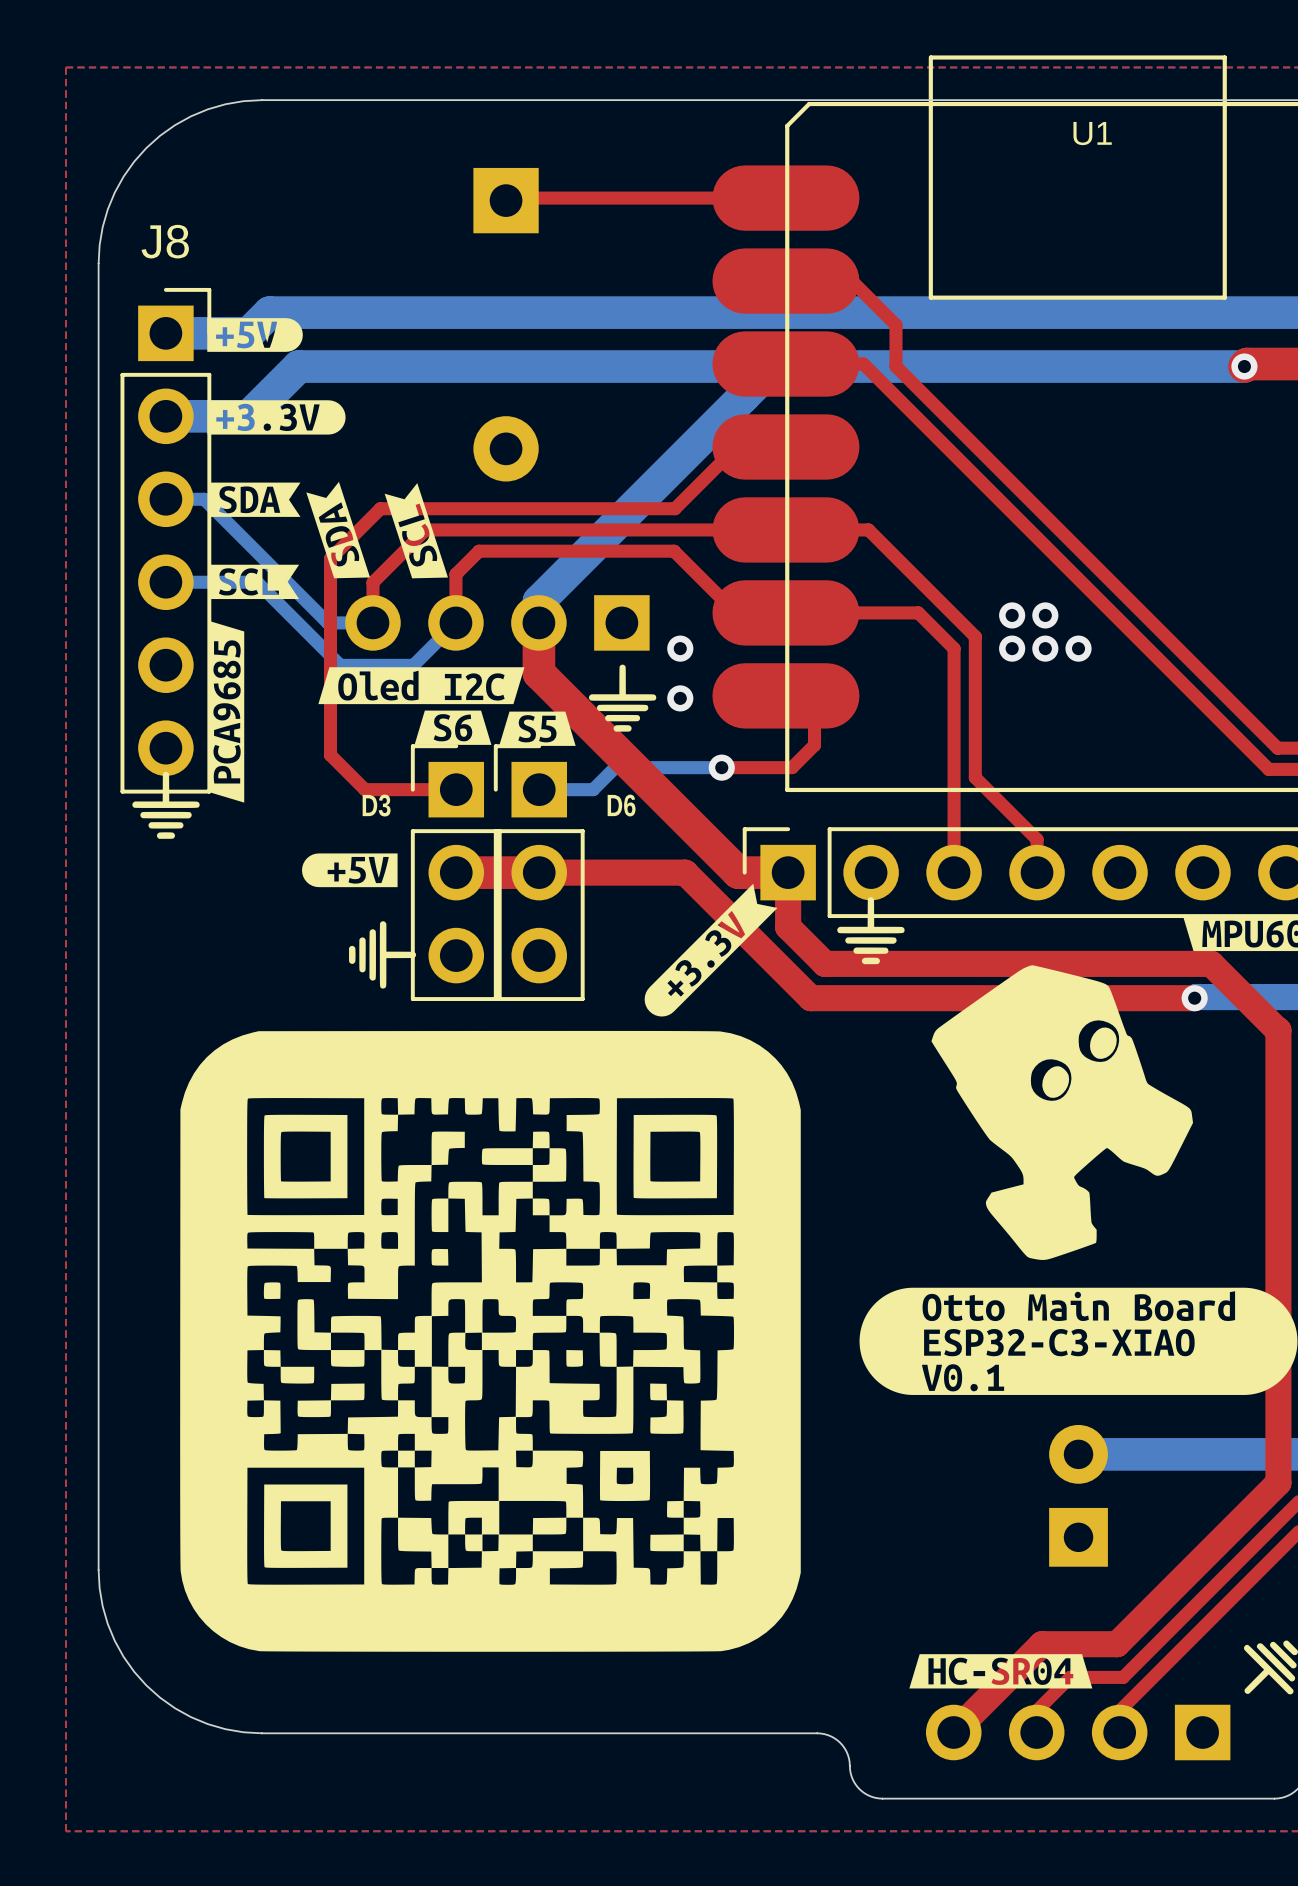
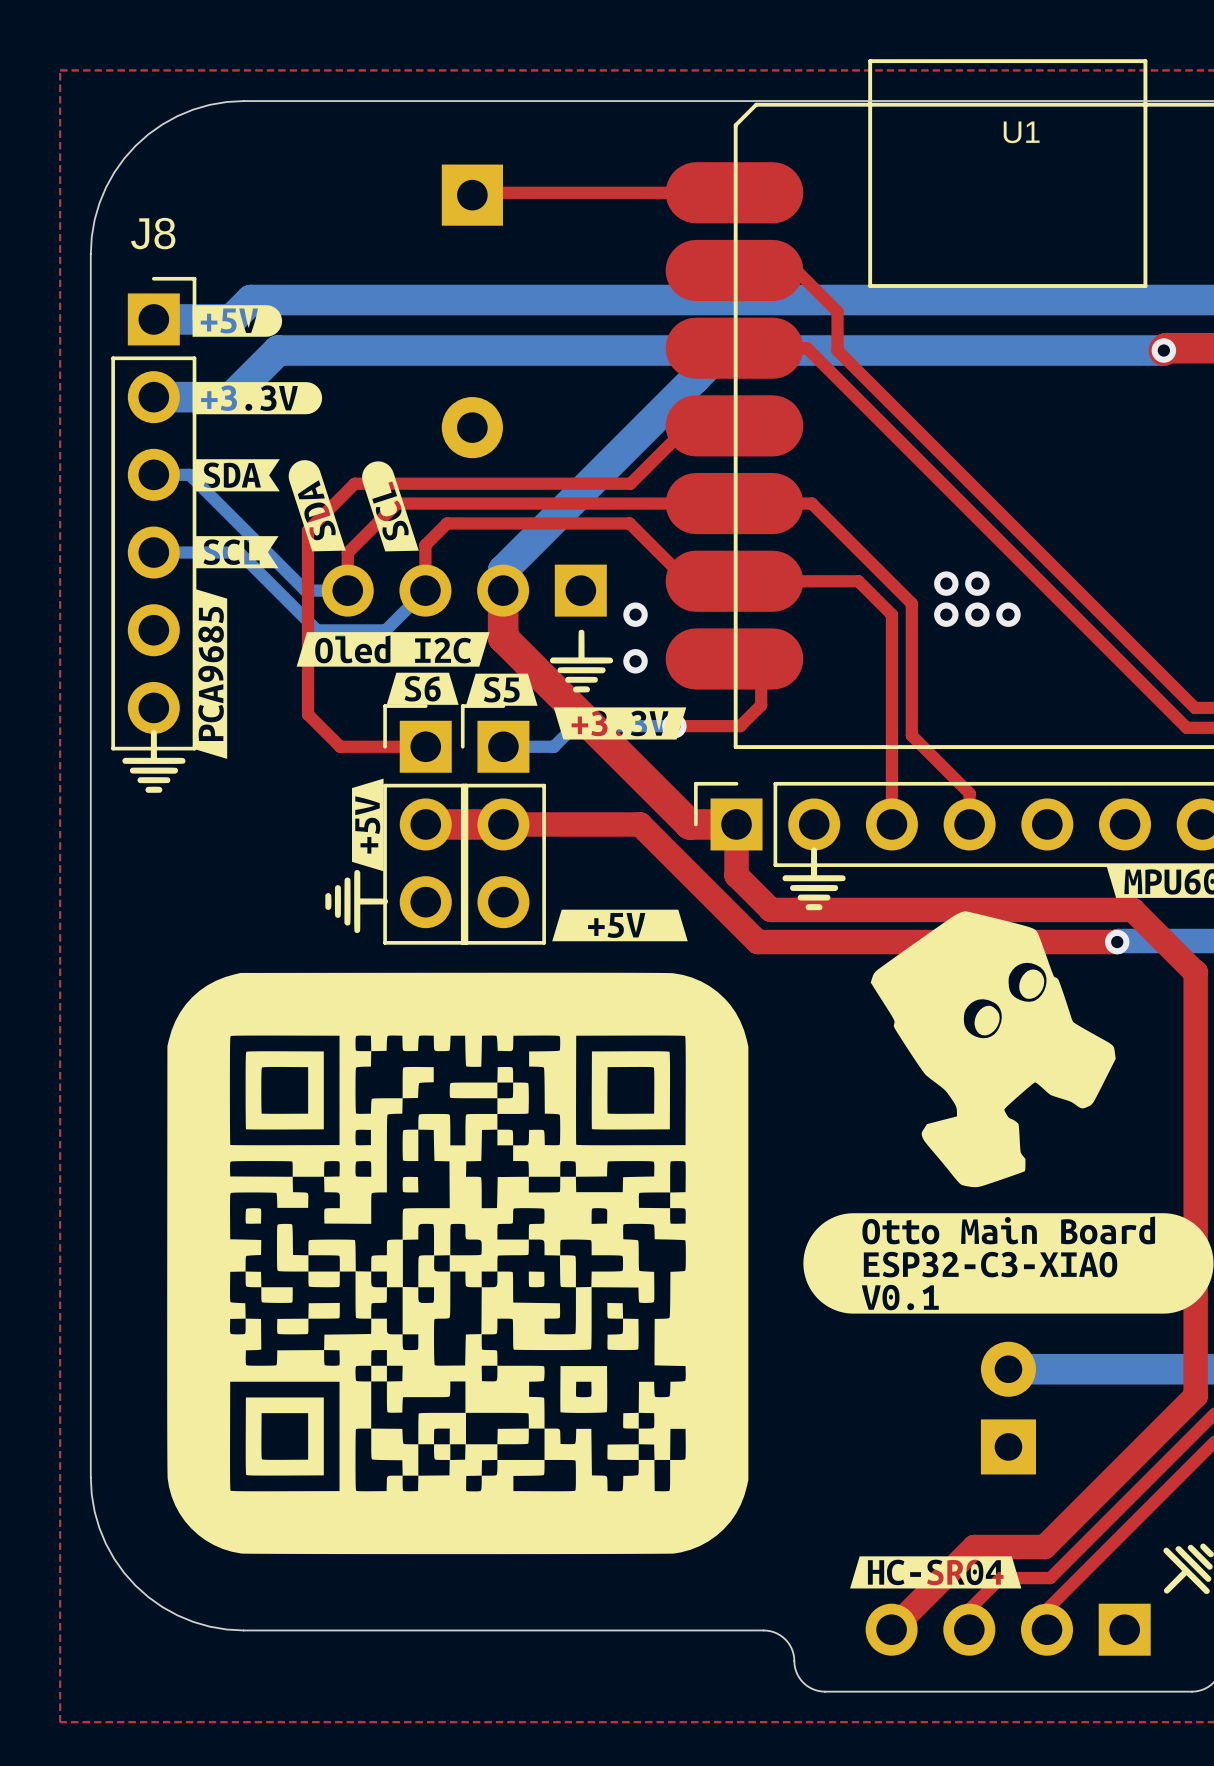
drawing shape: [306, 481, 371, 579] -> [288, 460, 346, 552]
drawing shape: [384, 483, 448, 579] -> [362, 461, 419, 552]
drawing: none -> [553, 707, 687, 740]
text: D3 (376, 805) -> none
text: D6 (621, 805) -> none
drawing: none -> [351, 778, 384, 872]
drawing: [302, 853, 398, 888] -> none
drawing: [644, 883, 778, 1017] -> none
drawing: none -> [552, 909, 688, 942]

